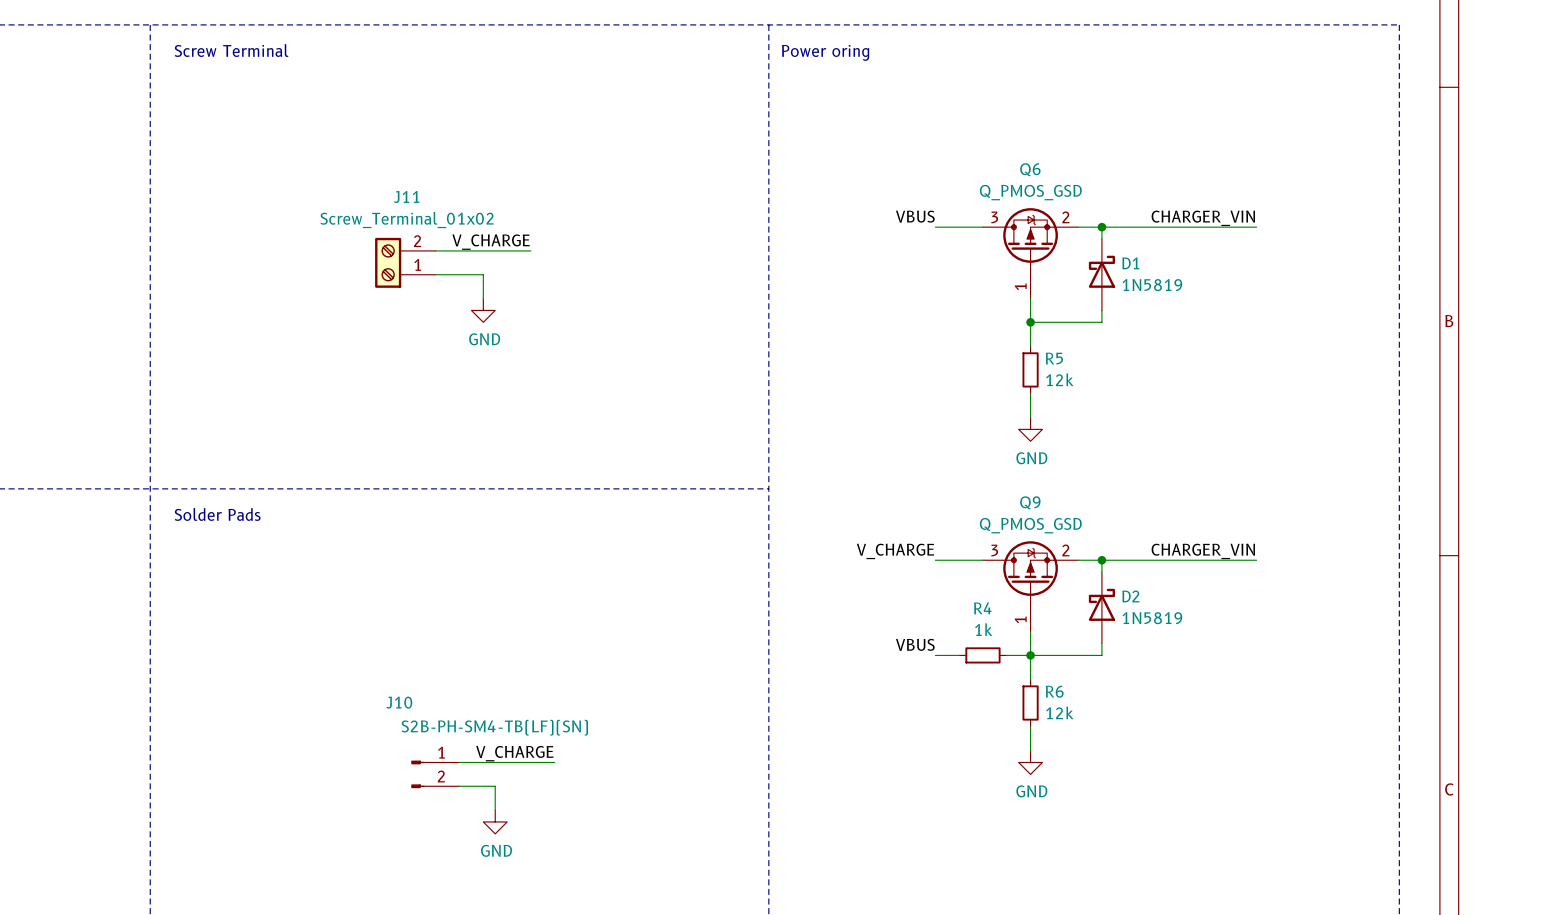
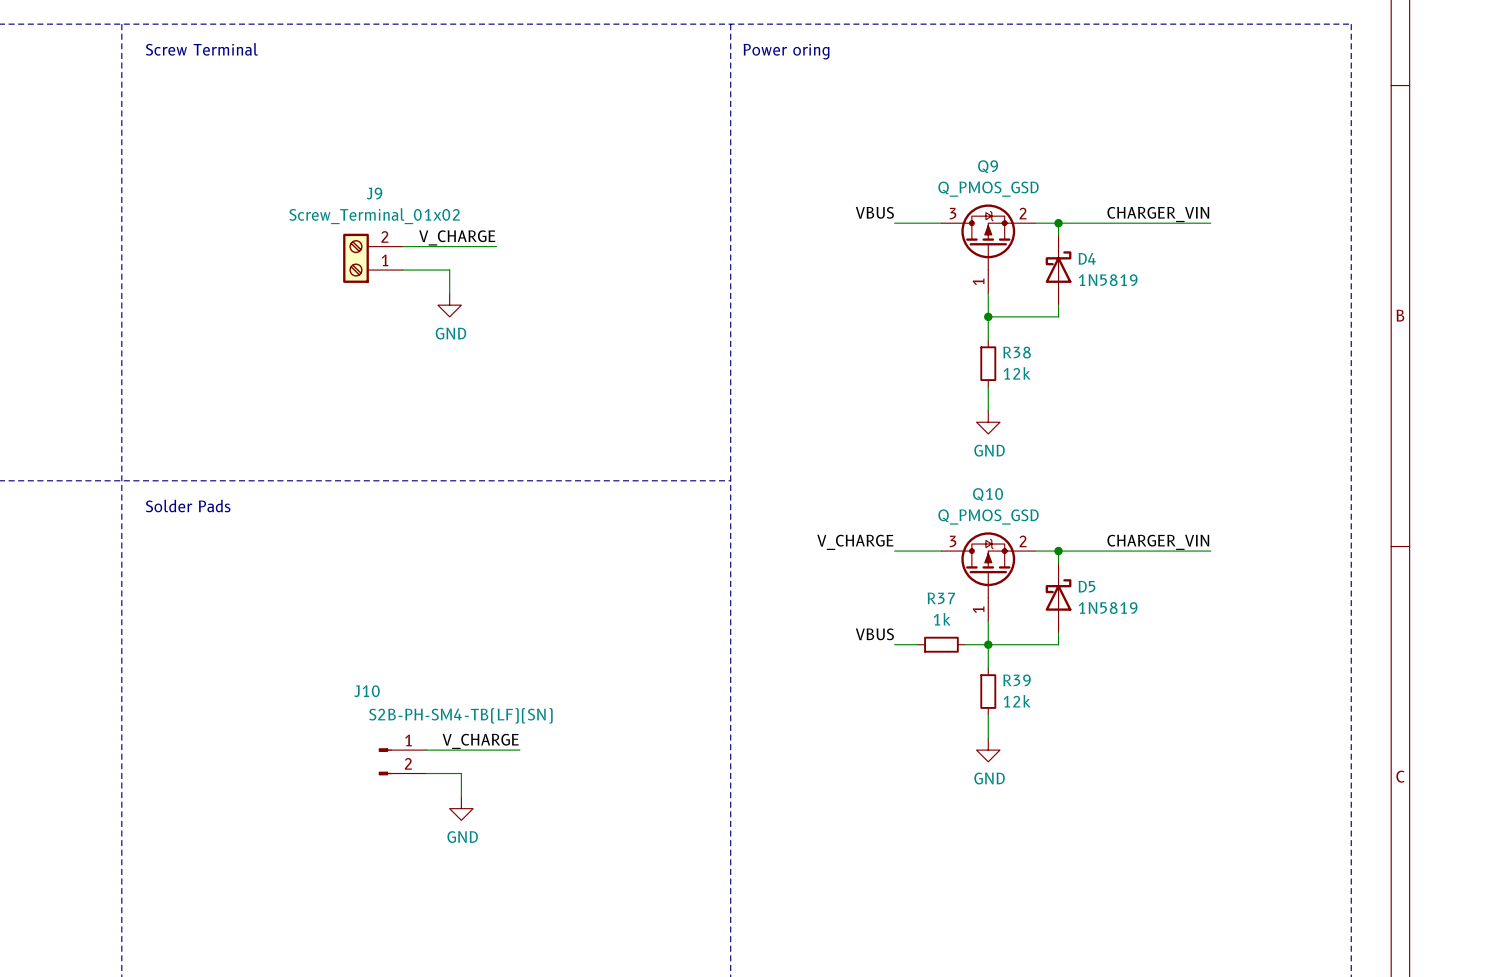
Q6 name: Q6 (1030, 169) -> Q9 (988, 166)
J11 name: J11 (406, 197) -> J9 (374, 193)
D1 name: D1 (1130, 263) -> D4 (1087, 258)
R5 name: R5 (1054, 358) -> R38 (1017, 352)
Q9 name: Q9 (1030, 502) -> Q10 (988, 494)
D2 name: D2 (1130, 596) -> D5 (1086, 586)
R4 name: R4 (982, 608) -> R37 (941, 598)
R6 name: R6 (1054, 691) -> R39 (1017, 680)

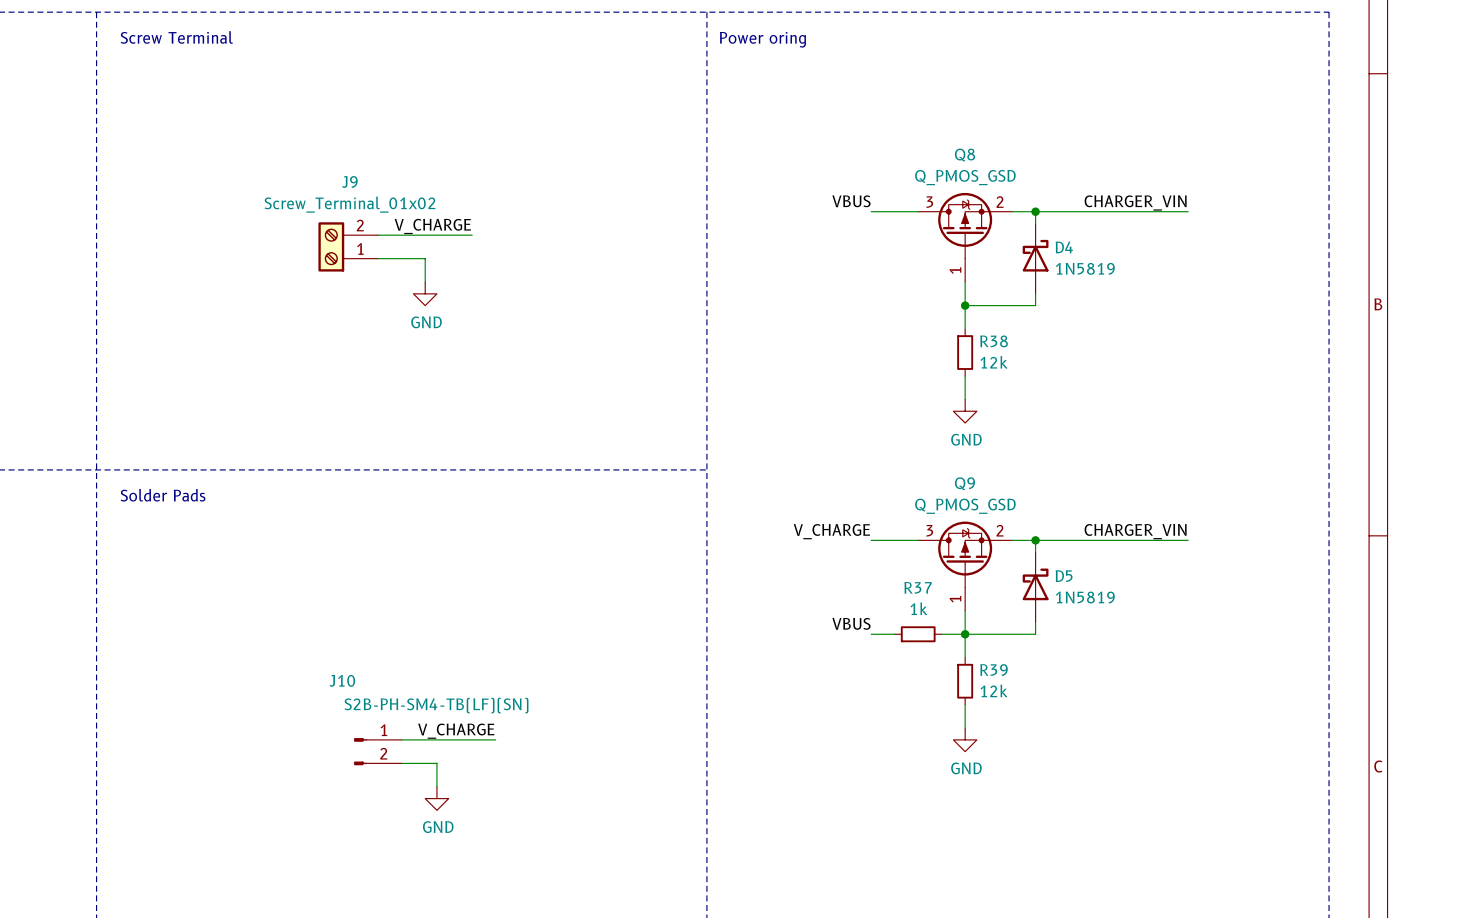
Q9 name: Q9 (988, 166) -> Q8 (964, 155)
Q10 name: Q10 (988, 494) -> Q9 (964, 483)

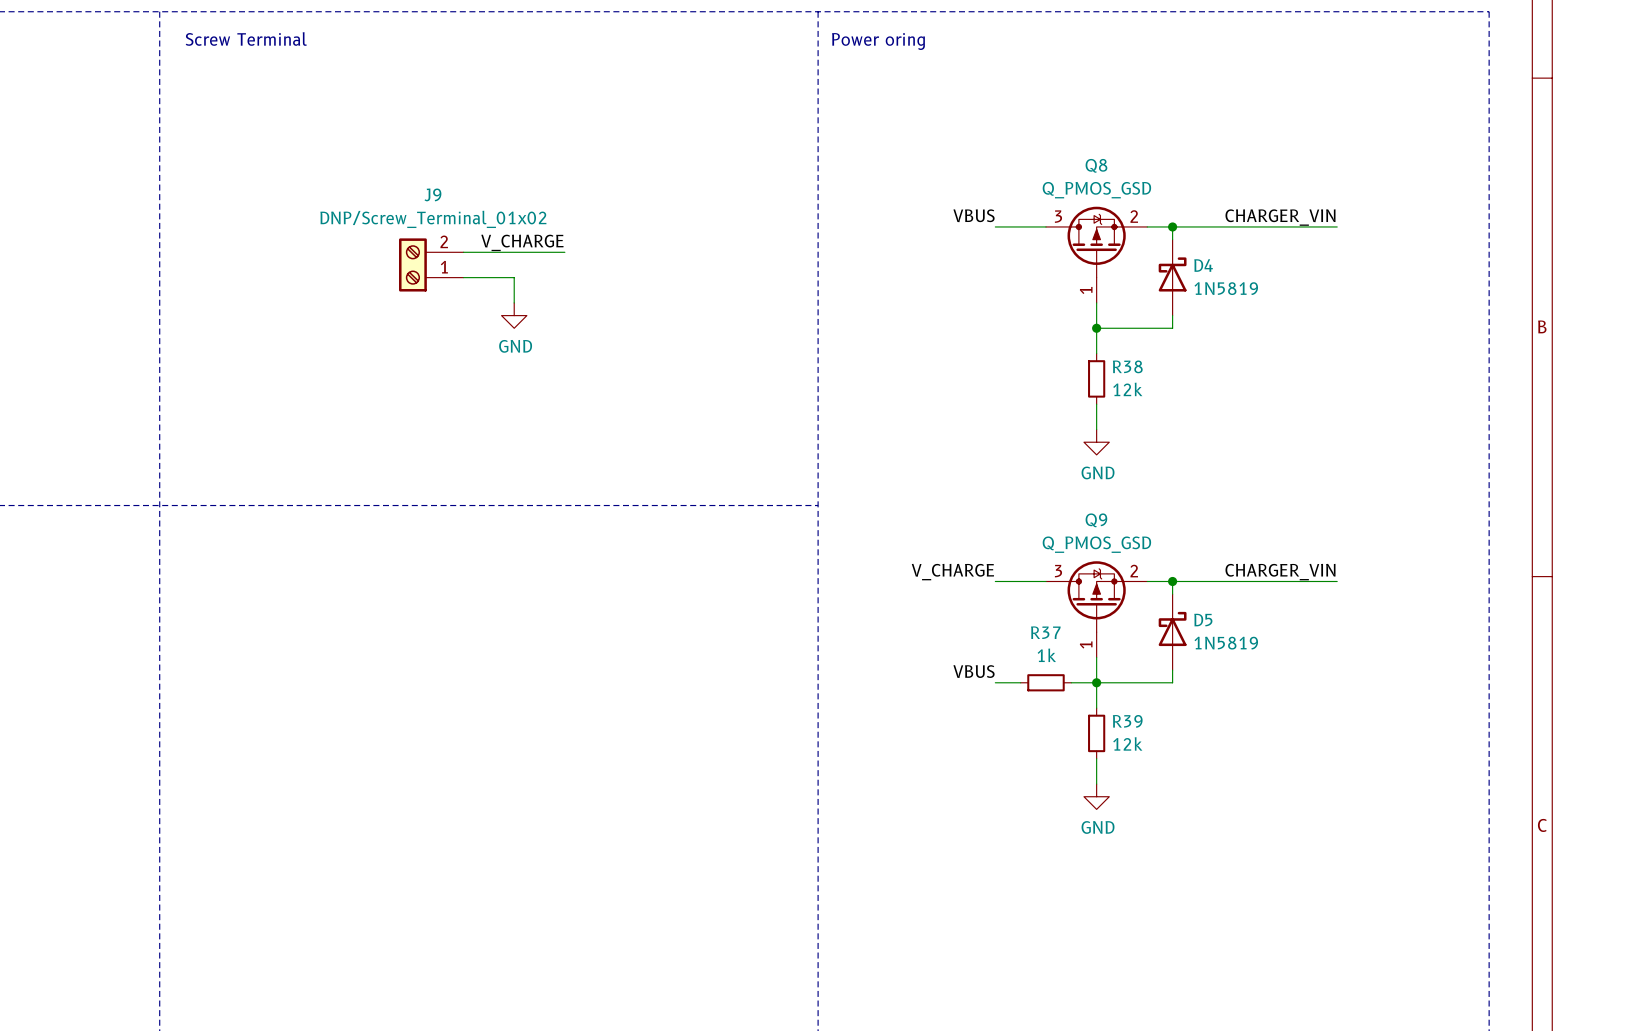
J9 value: Screw_Terminal_01x02 (349, 204) -> DNP/Screw_Terminal_01x02 (433, 219)
text: Solder Pads (163, 495) -> none
label: V_CHARGE (456, 731) -> none
wire: (401, 739) (495, 739) -> none
J10: S2B-PH-SM4-TB(LF)(SN) (377, 751) -> none
wire: (401, 763) (436, 763) (436, 786) -> none
power symbol: GND (436, 798) -> none

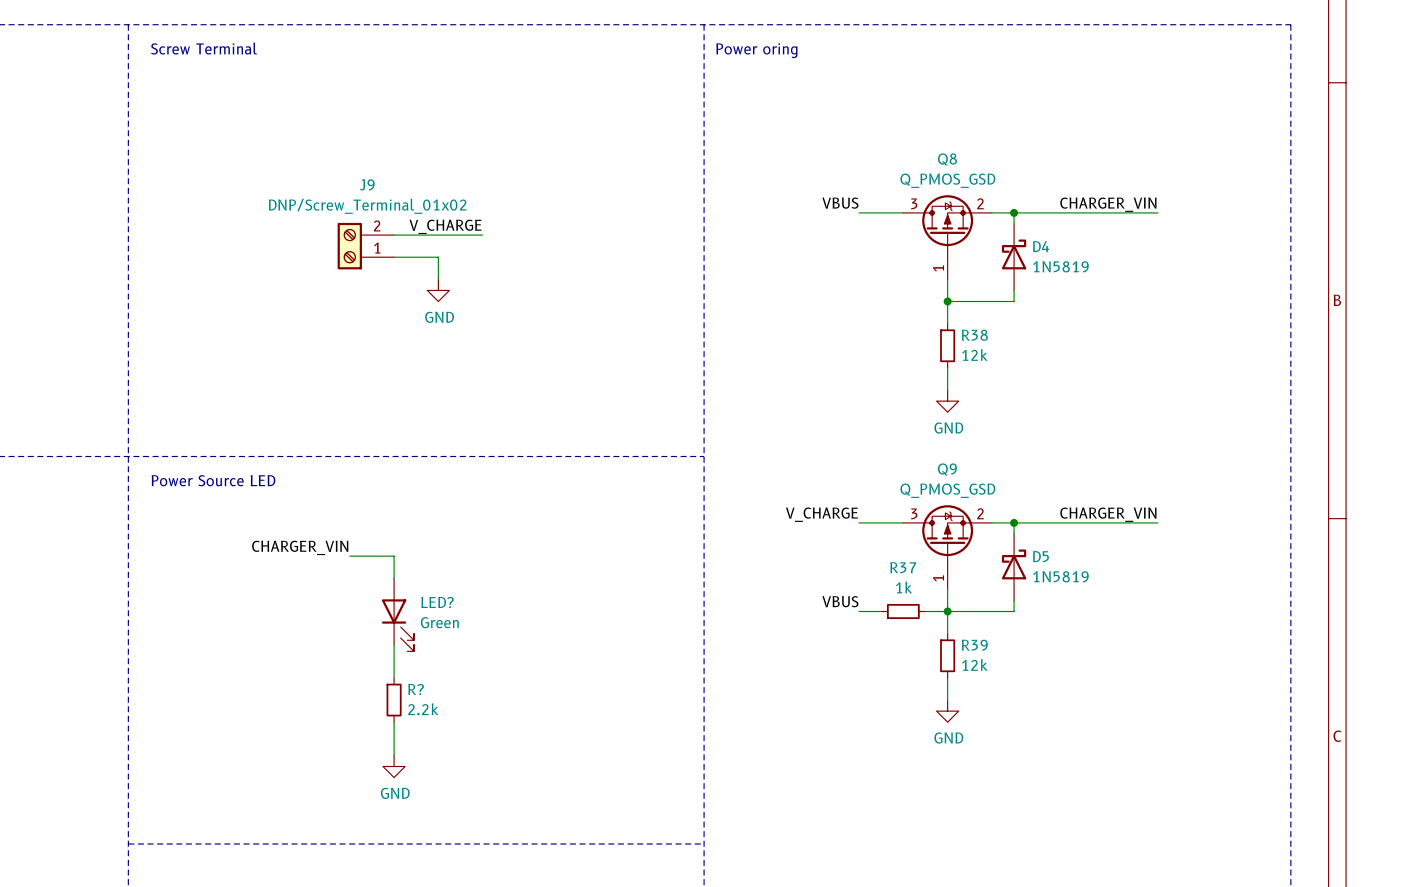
text: none -> Power Source LED (213, 480)
label: none -> CHARGER_VIN (300, 547)
wire: none -> (349, 556) (394, 556) (394, 578)
LED?: none -> (397, 614)
wire: none -> (394, 644) (394, 677)
R?: none -> 2.2k (394, 700)
wire: none -> (394, 722) (394, 755)
power symbol: none -> GND (394, 766)
line: none -> (128, 843) (704, 843)

